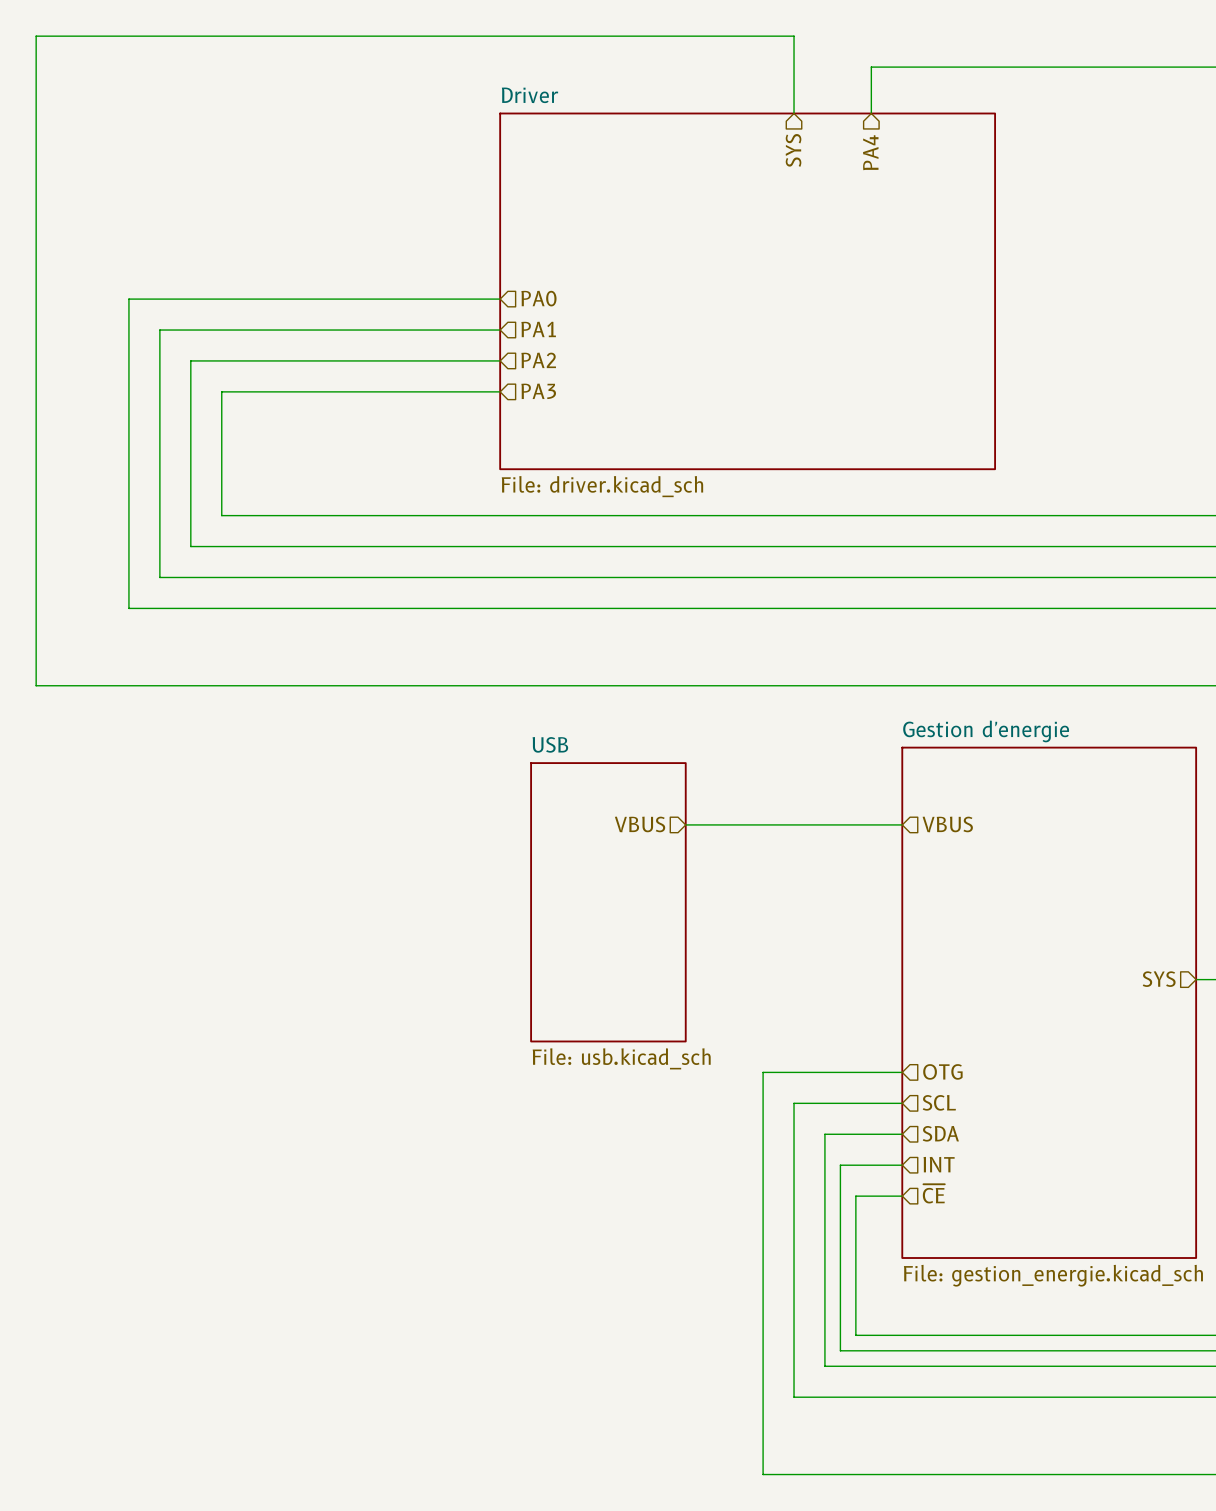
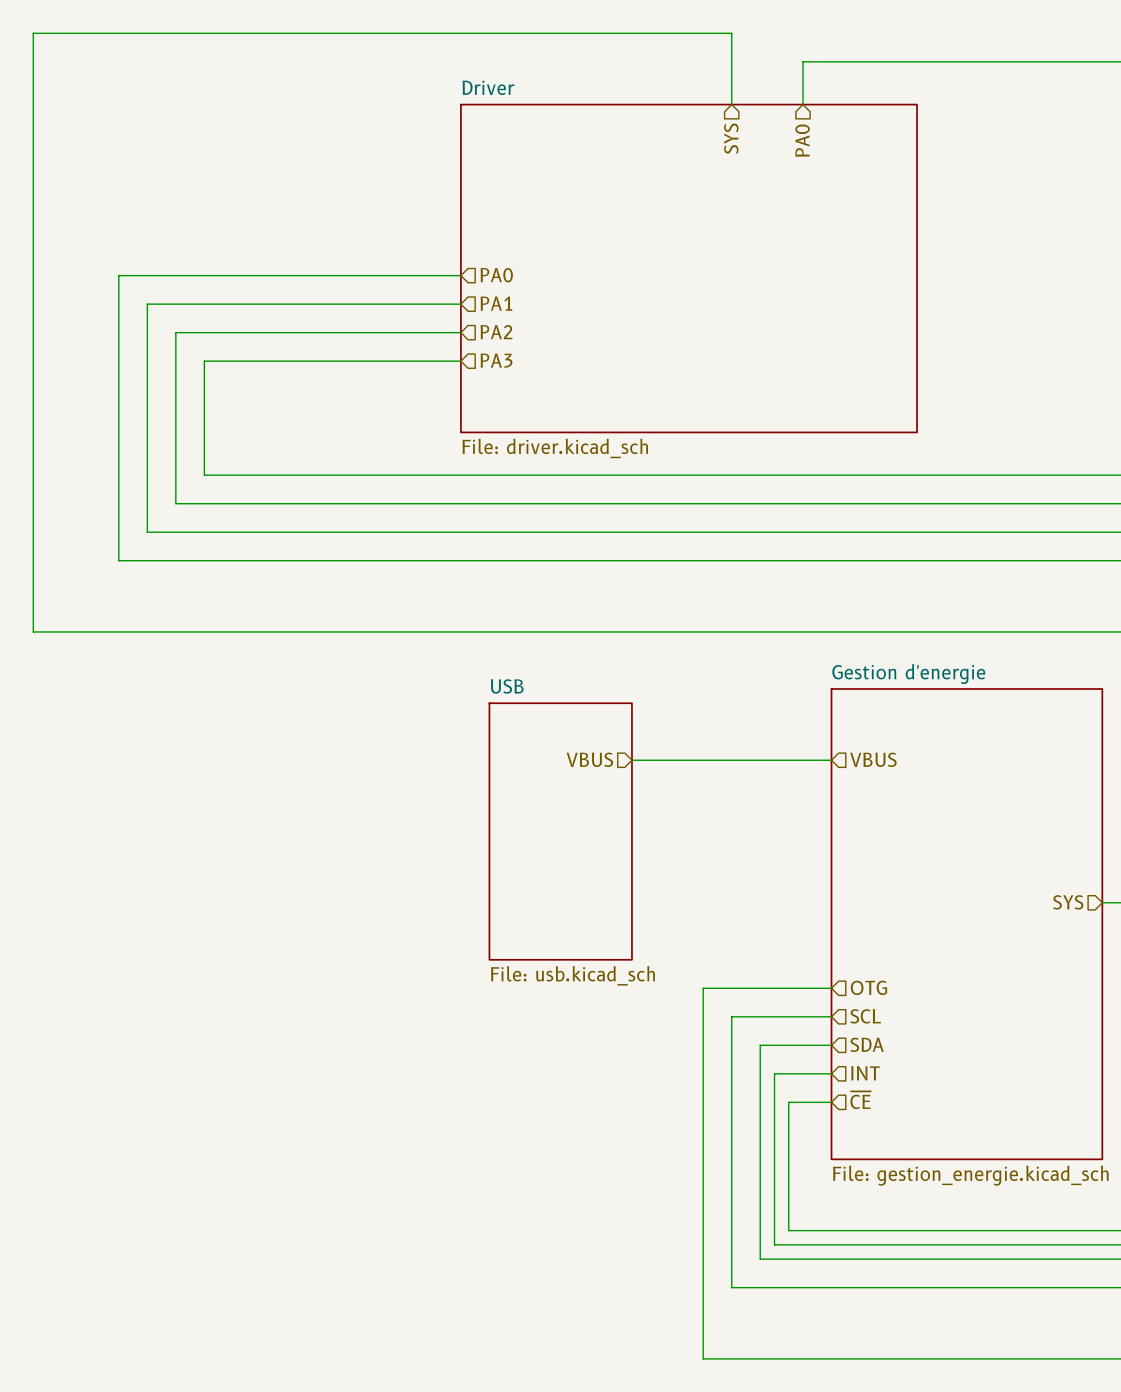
hierarchical label: PA4 (870, 152) -> PA0 (802, 140)

